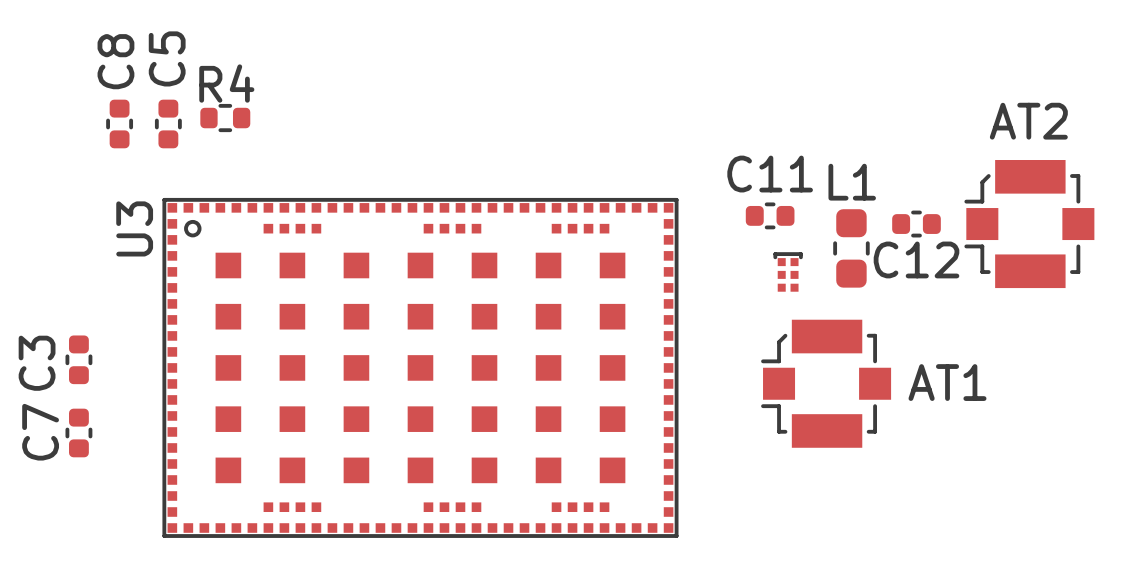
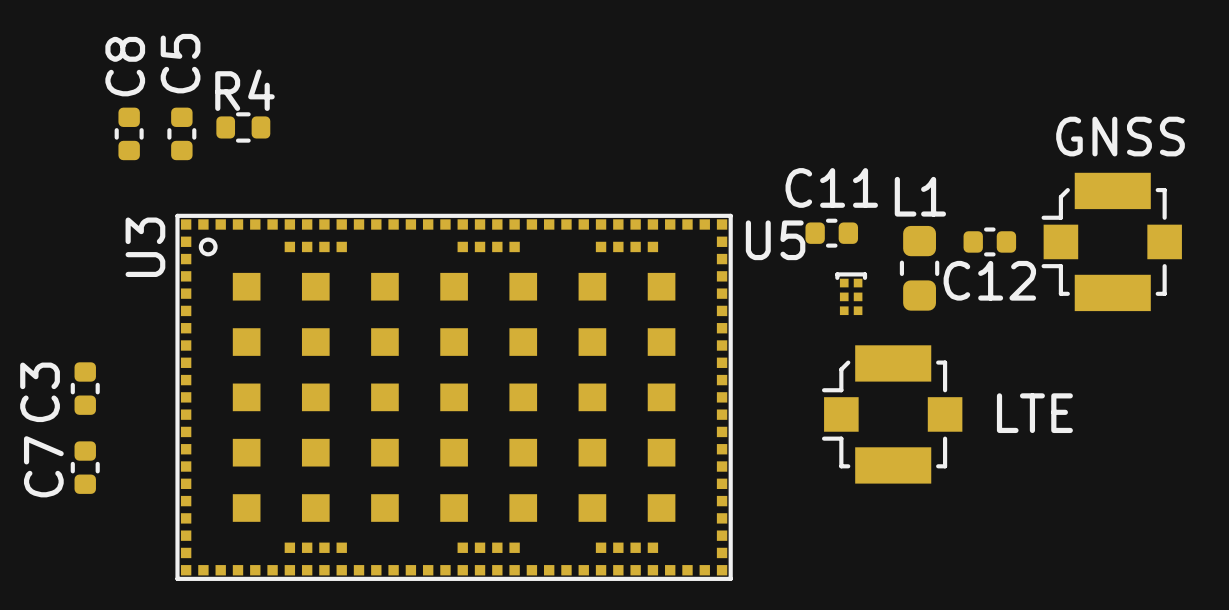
AT2 name: AT2 (1028, 121) -> none
text: none -> GNSS (1120, 136)
U5 name: none -> U5 (775, 240)
AT1 name: AT1 (947, 382) -> none
text: none -> LTE (1034, 413)

